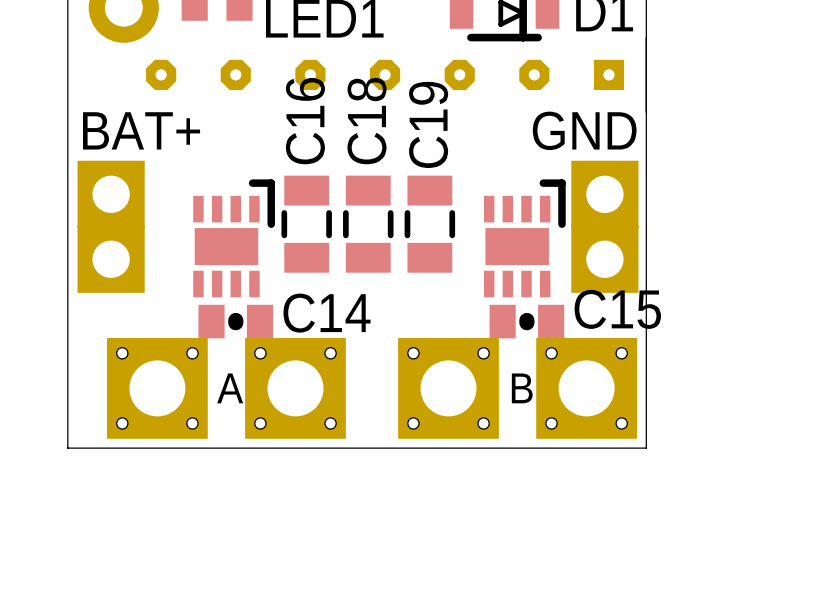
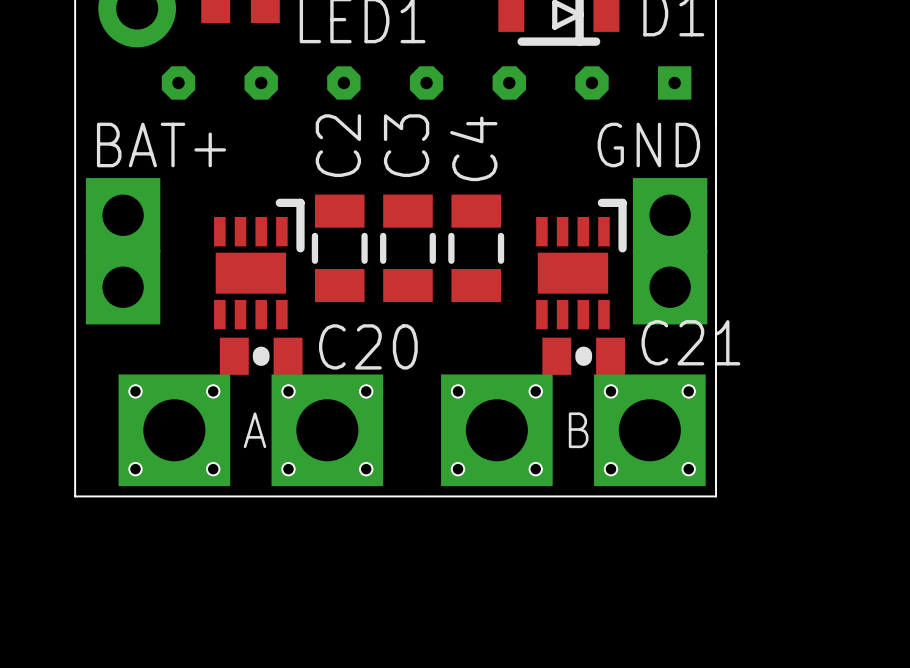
C16 name: C16 (305, 121) -> C2 (338, 145)
C18 name: C18 (367, 121) -> C3 (406, 145)
C19 name: C19 (428, 124) -> C4 (473, 148)
C15 name: C15 (617, 309) -> C21 (690, 342)
C14 name: C14 (327, 313) -> C20 (368, 346)

